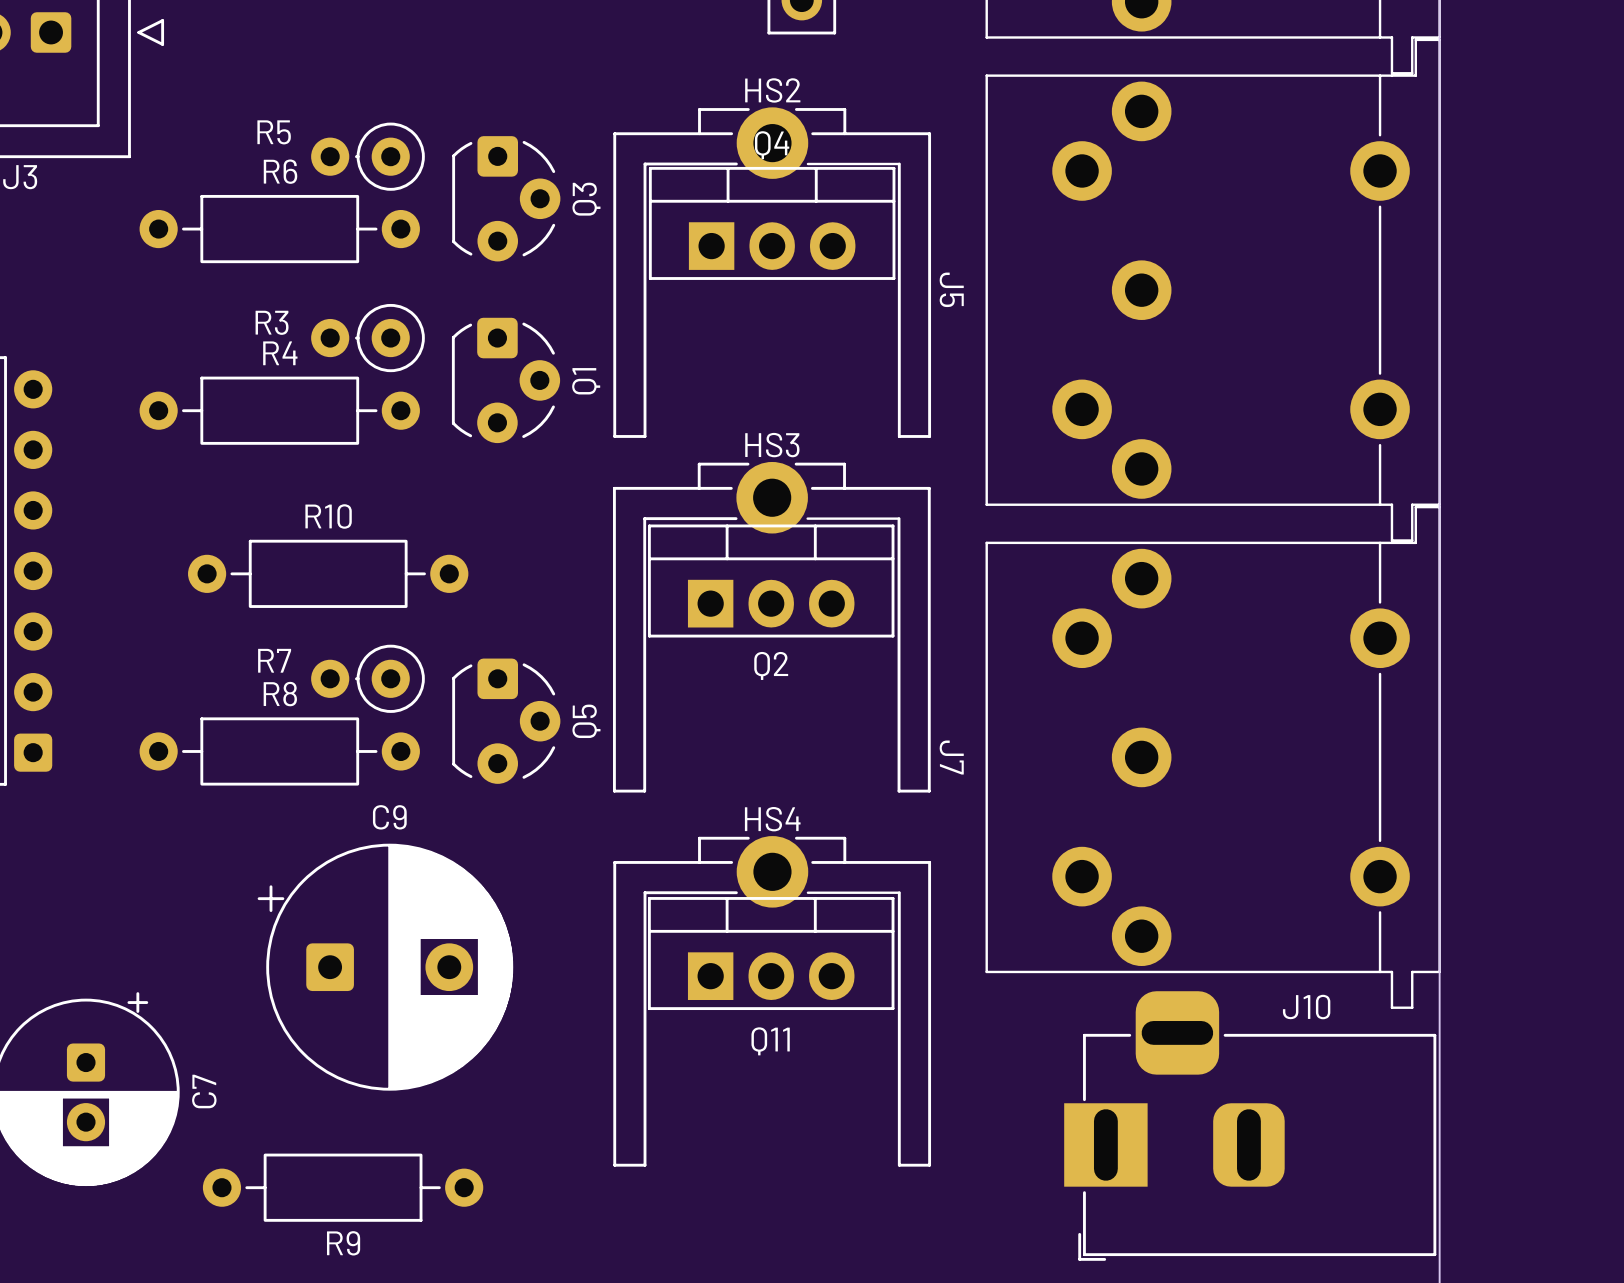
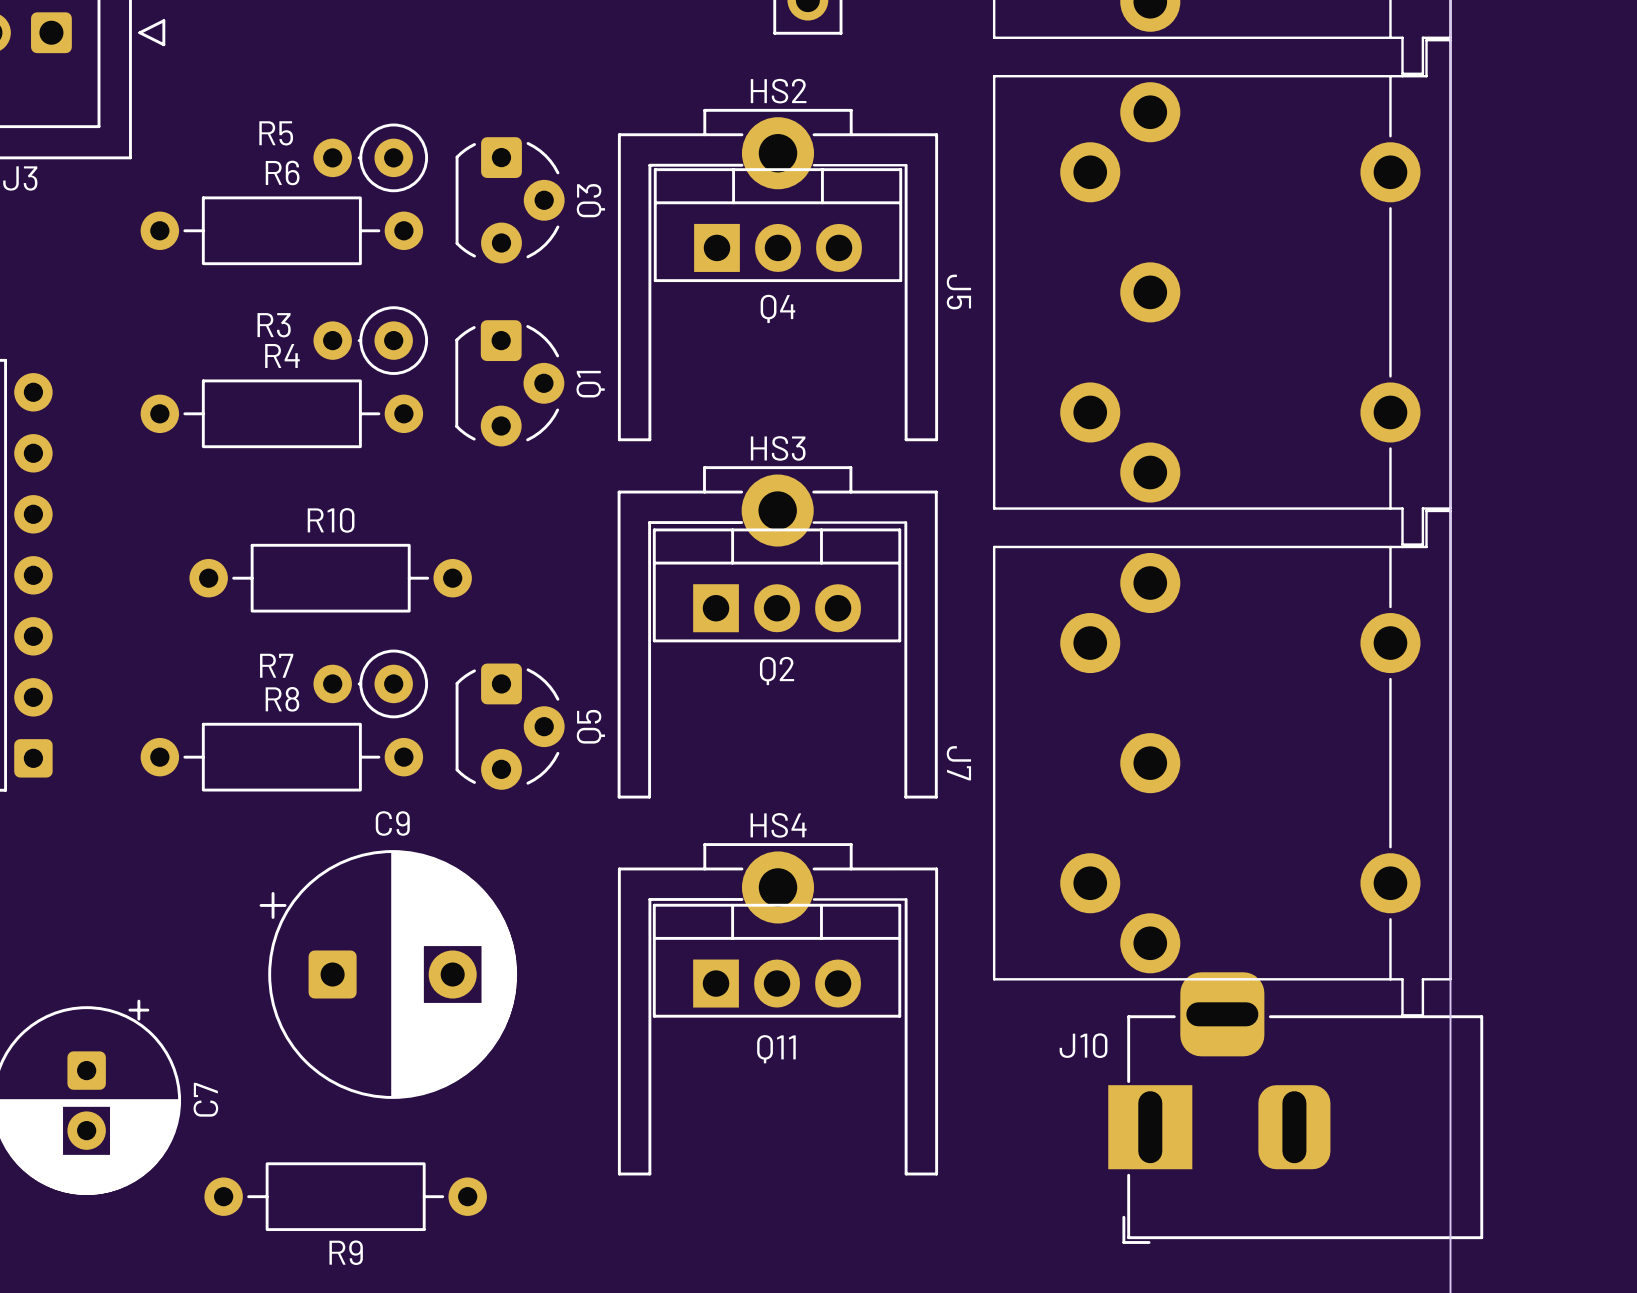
HS2 footprint: [613, 107, 932, 438] -> [617, 108, 939, 442]
Q4 name position: Q4 (772, 145) -> Q4 (777, 308)
HS3 footprint: [613, 461, 931, 793] -> [617, 466, 938, 799]
HS4 footprint: [613, 836, 932, 1167] -> [617, 843, 939, 1176]
J10 name position: J10 (1306, 1007) -> J10 (1083, 1045)
J10 position: (1250, 1126) -> (1295, 1108)

